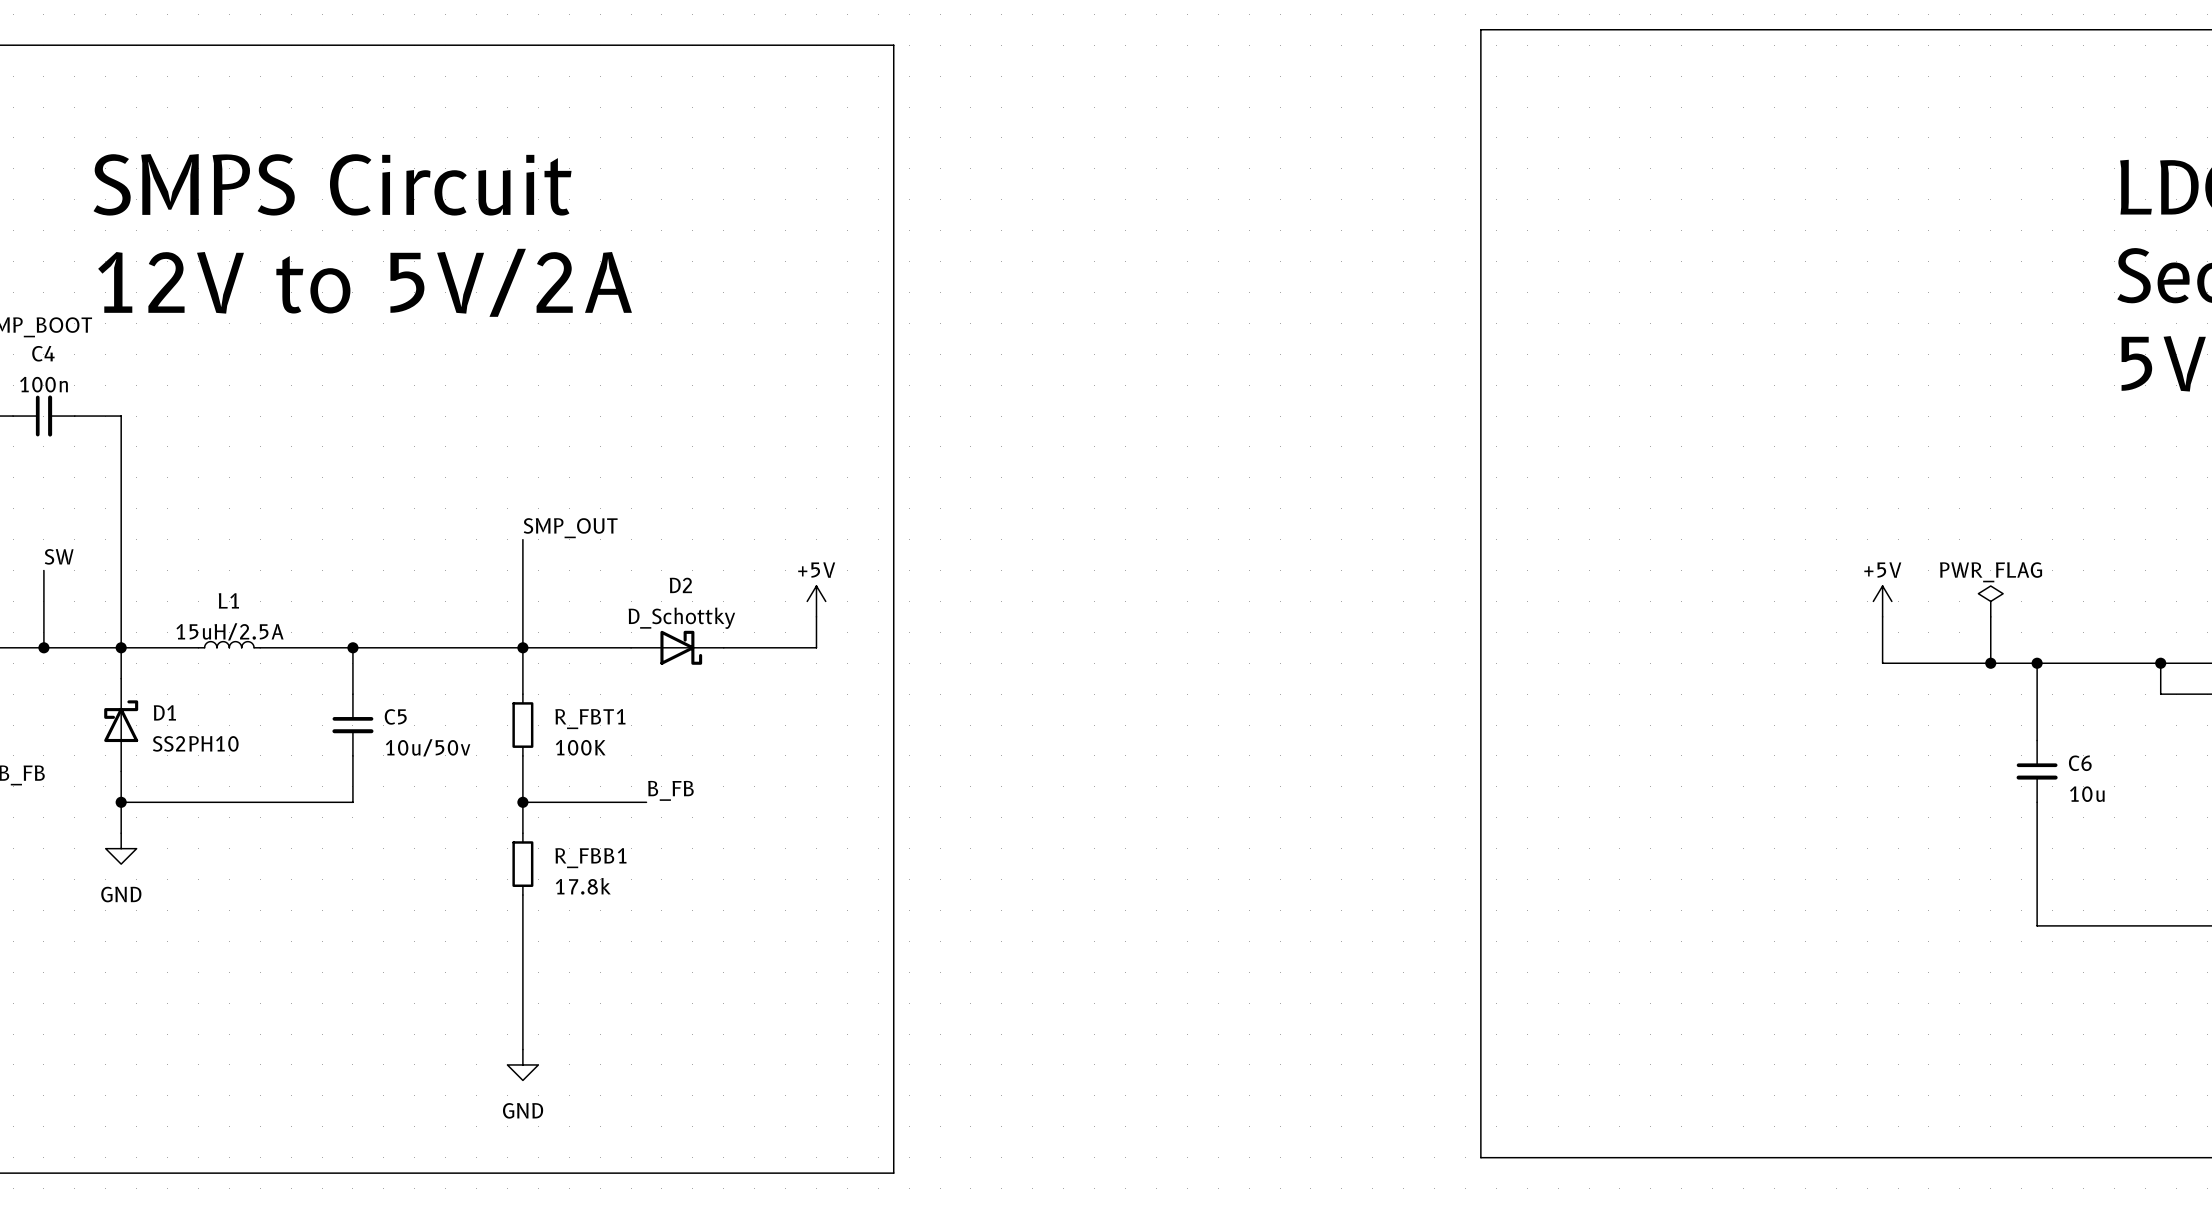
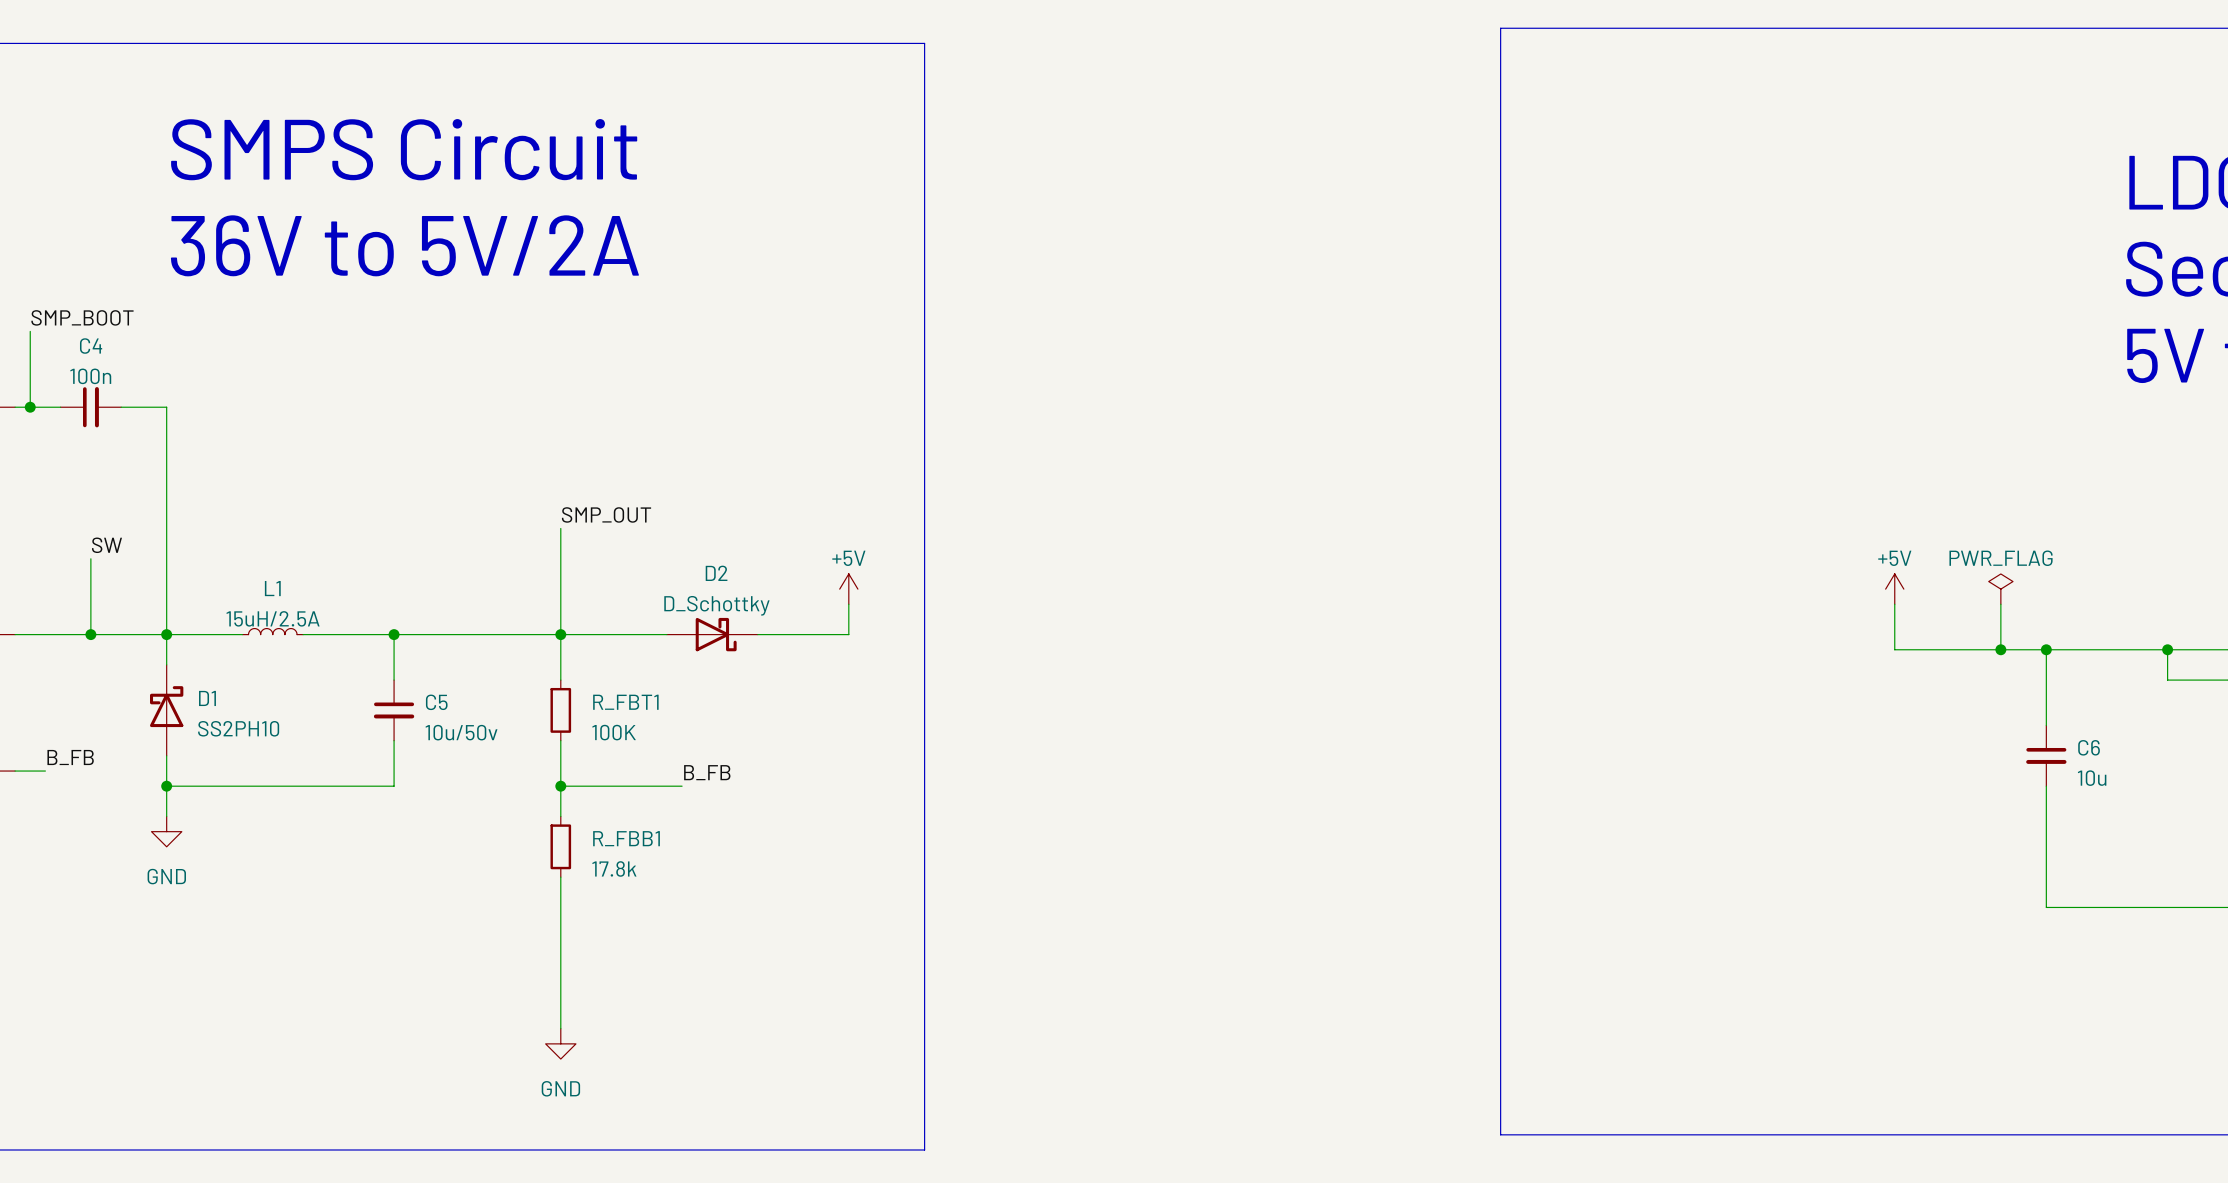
text position: SMPS Circuit (332, 184) -> SMPS Circuit (404, 149)
text: 12V to 5V/2A (365, 282) -> 36V to 5V/2A (404, 245)

